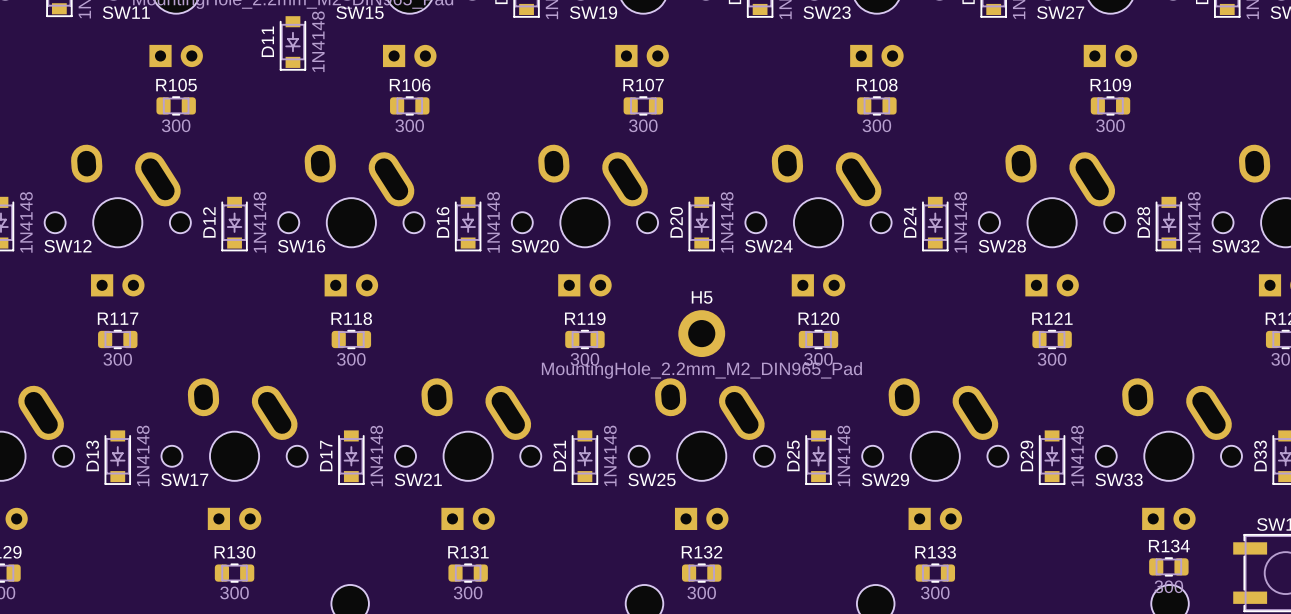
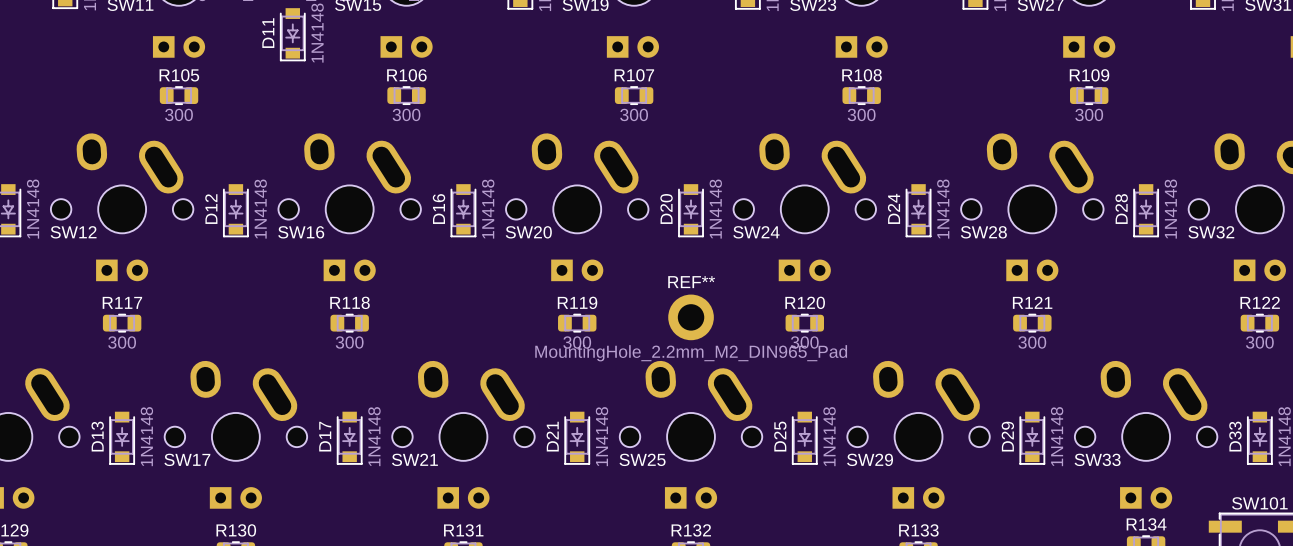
H5 name: H5 (702, 297) -> REF** (691, 282)

